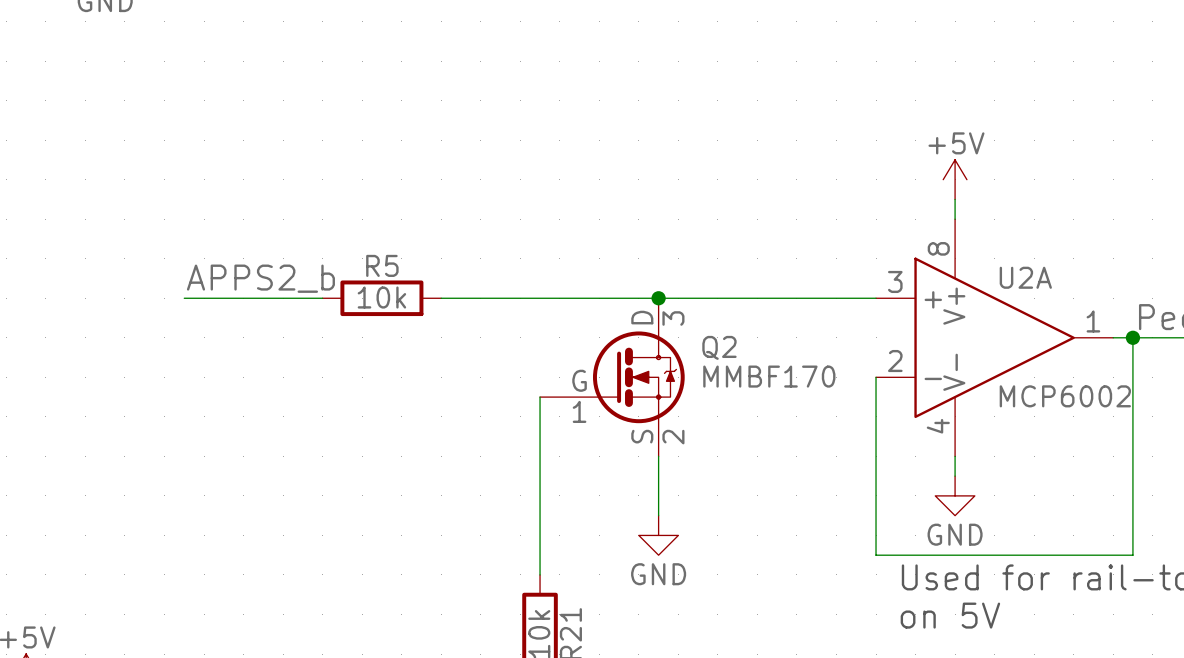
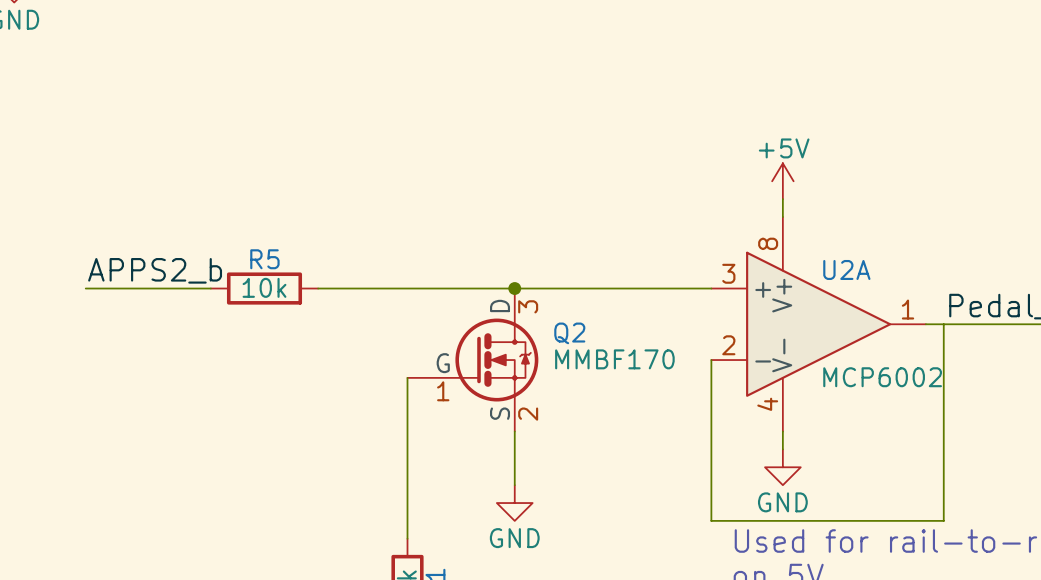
junction: (1132, 337) -> none

